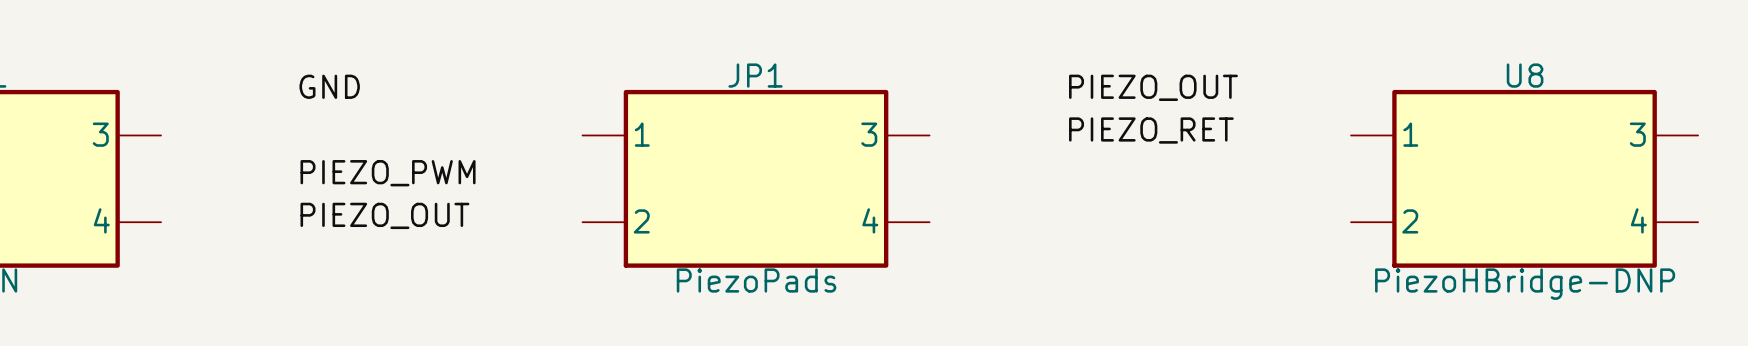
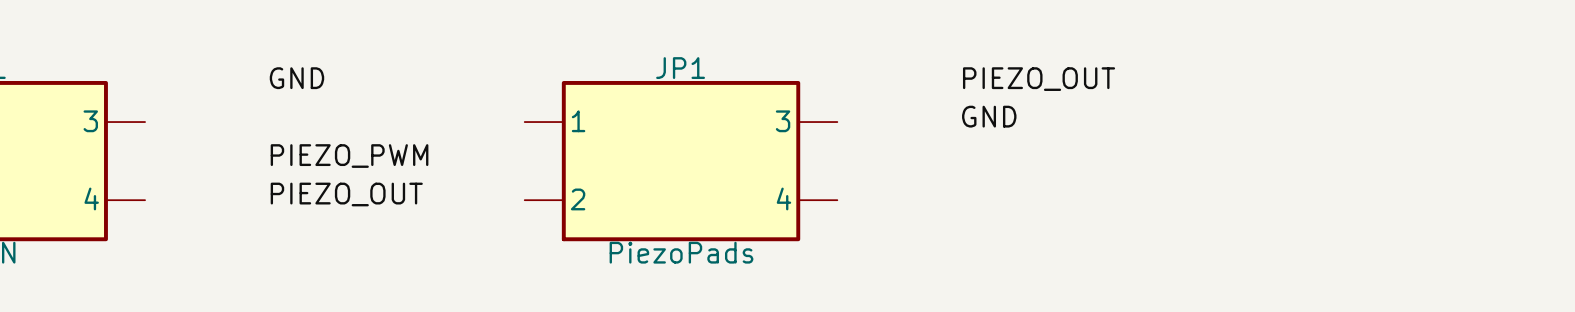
label: PIEZO_RET (1151, 130) -> GND (989, 116)
U8: PiezoHBridge-DNP (1524, 178) -> none

